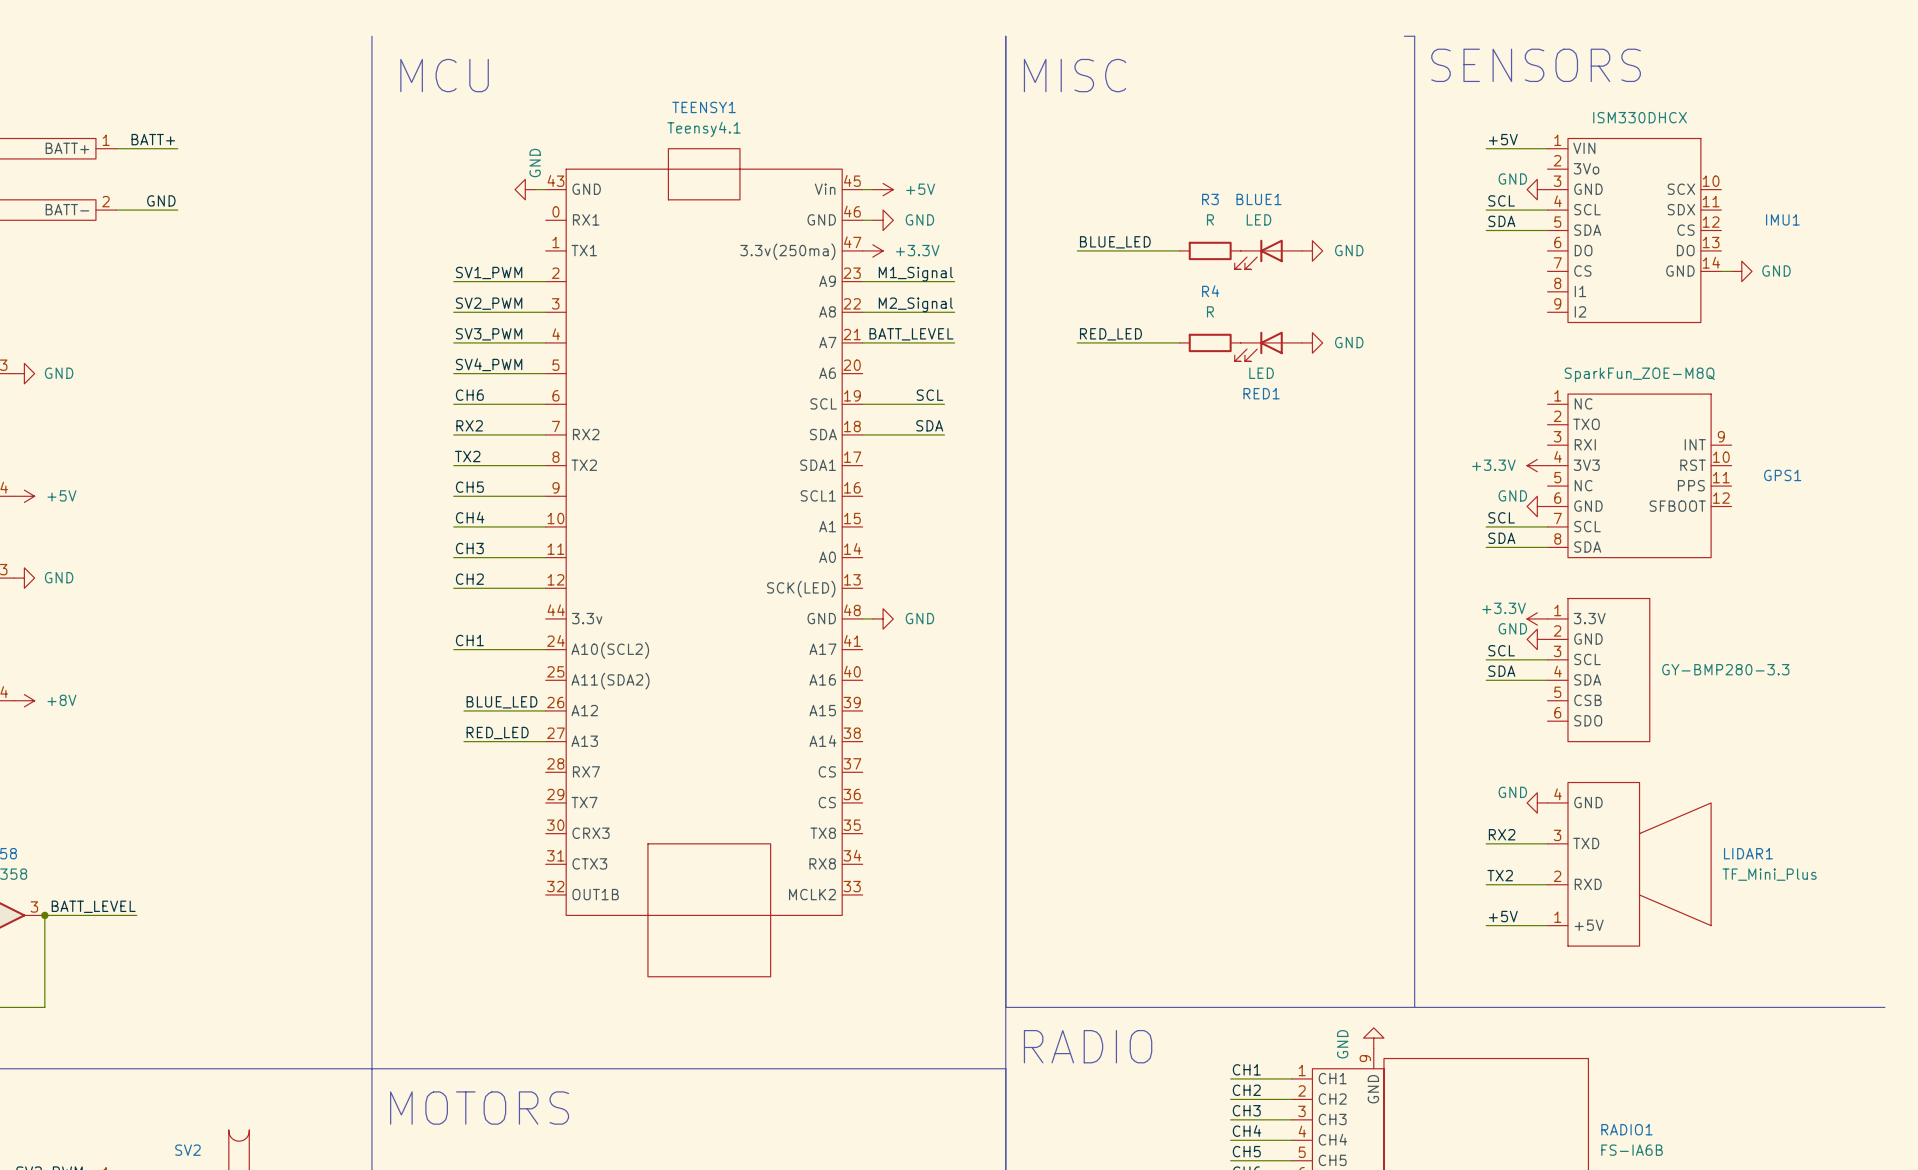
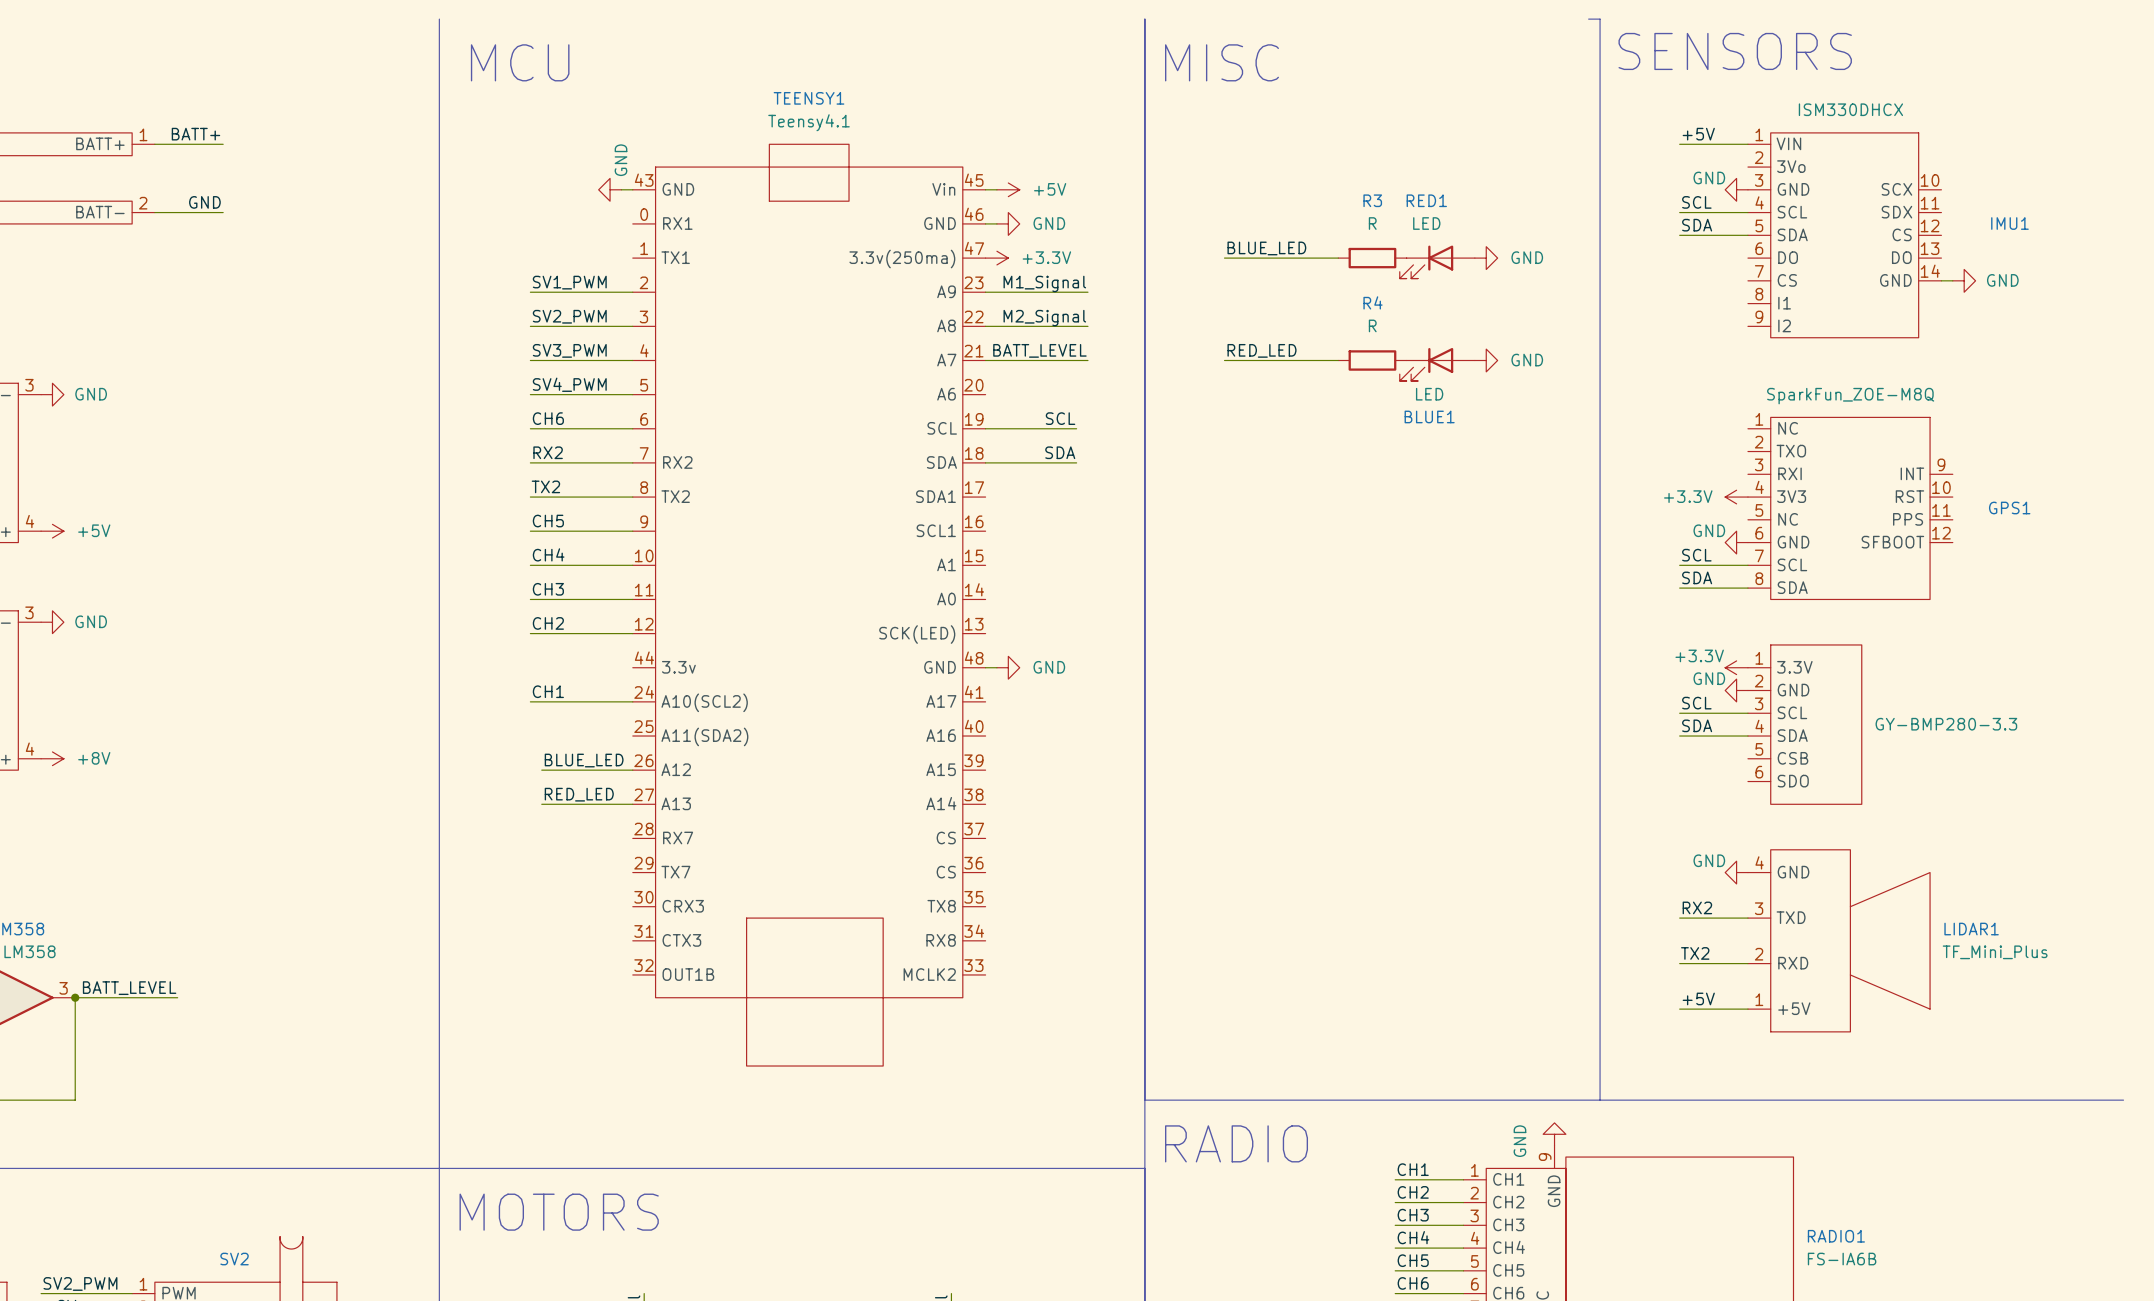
BLUE1 name: BLUE1 (1259, 199) -> RED1 (1426, 200)
RED1 name: RED1 (1261, 393) -> BLUE1 (1429, 416)

